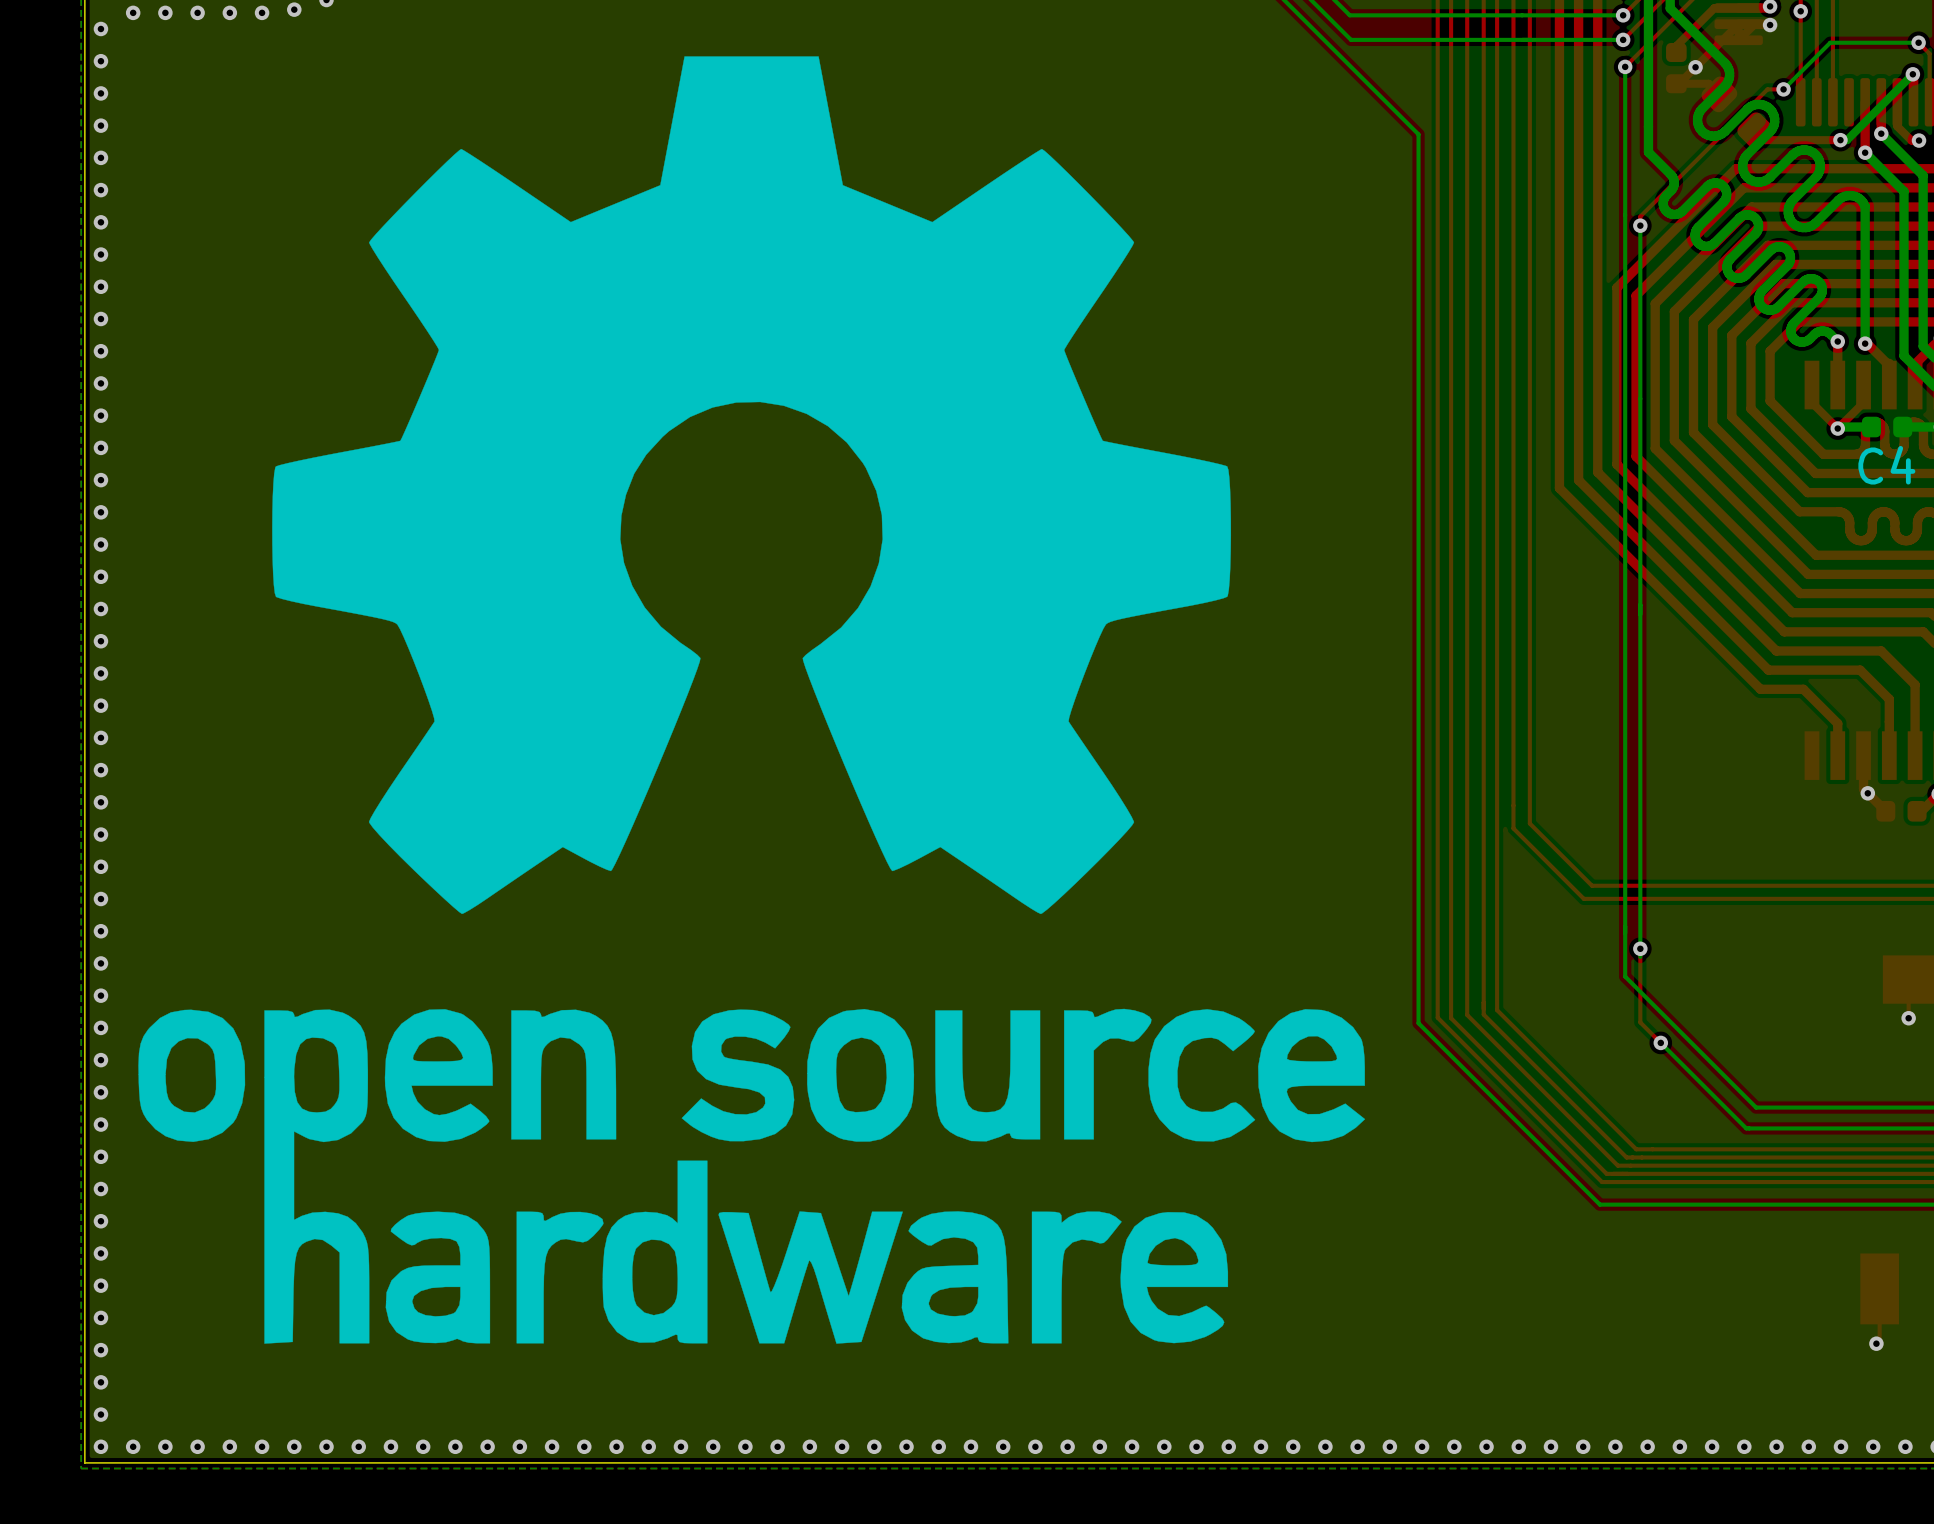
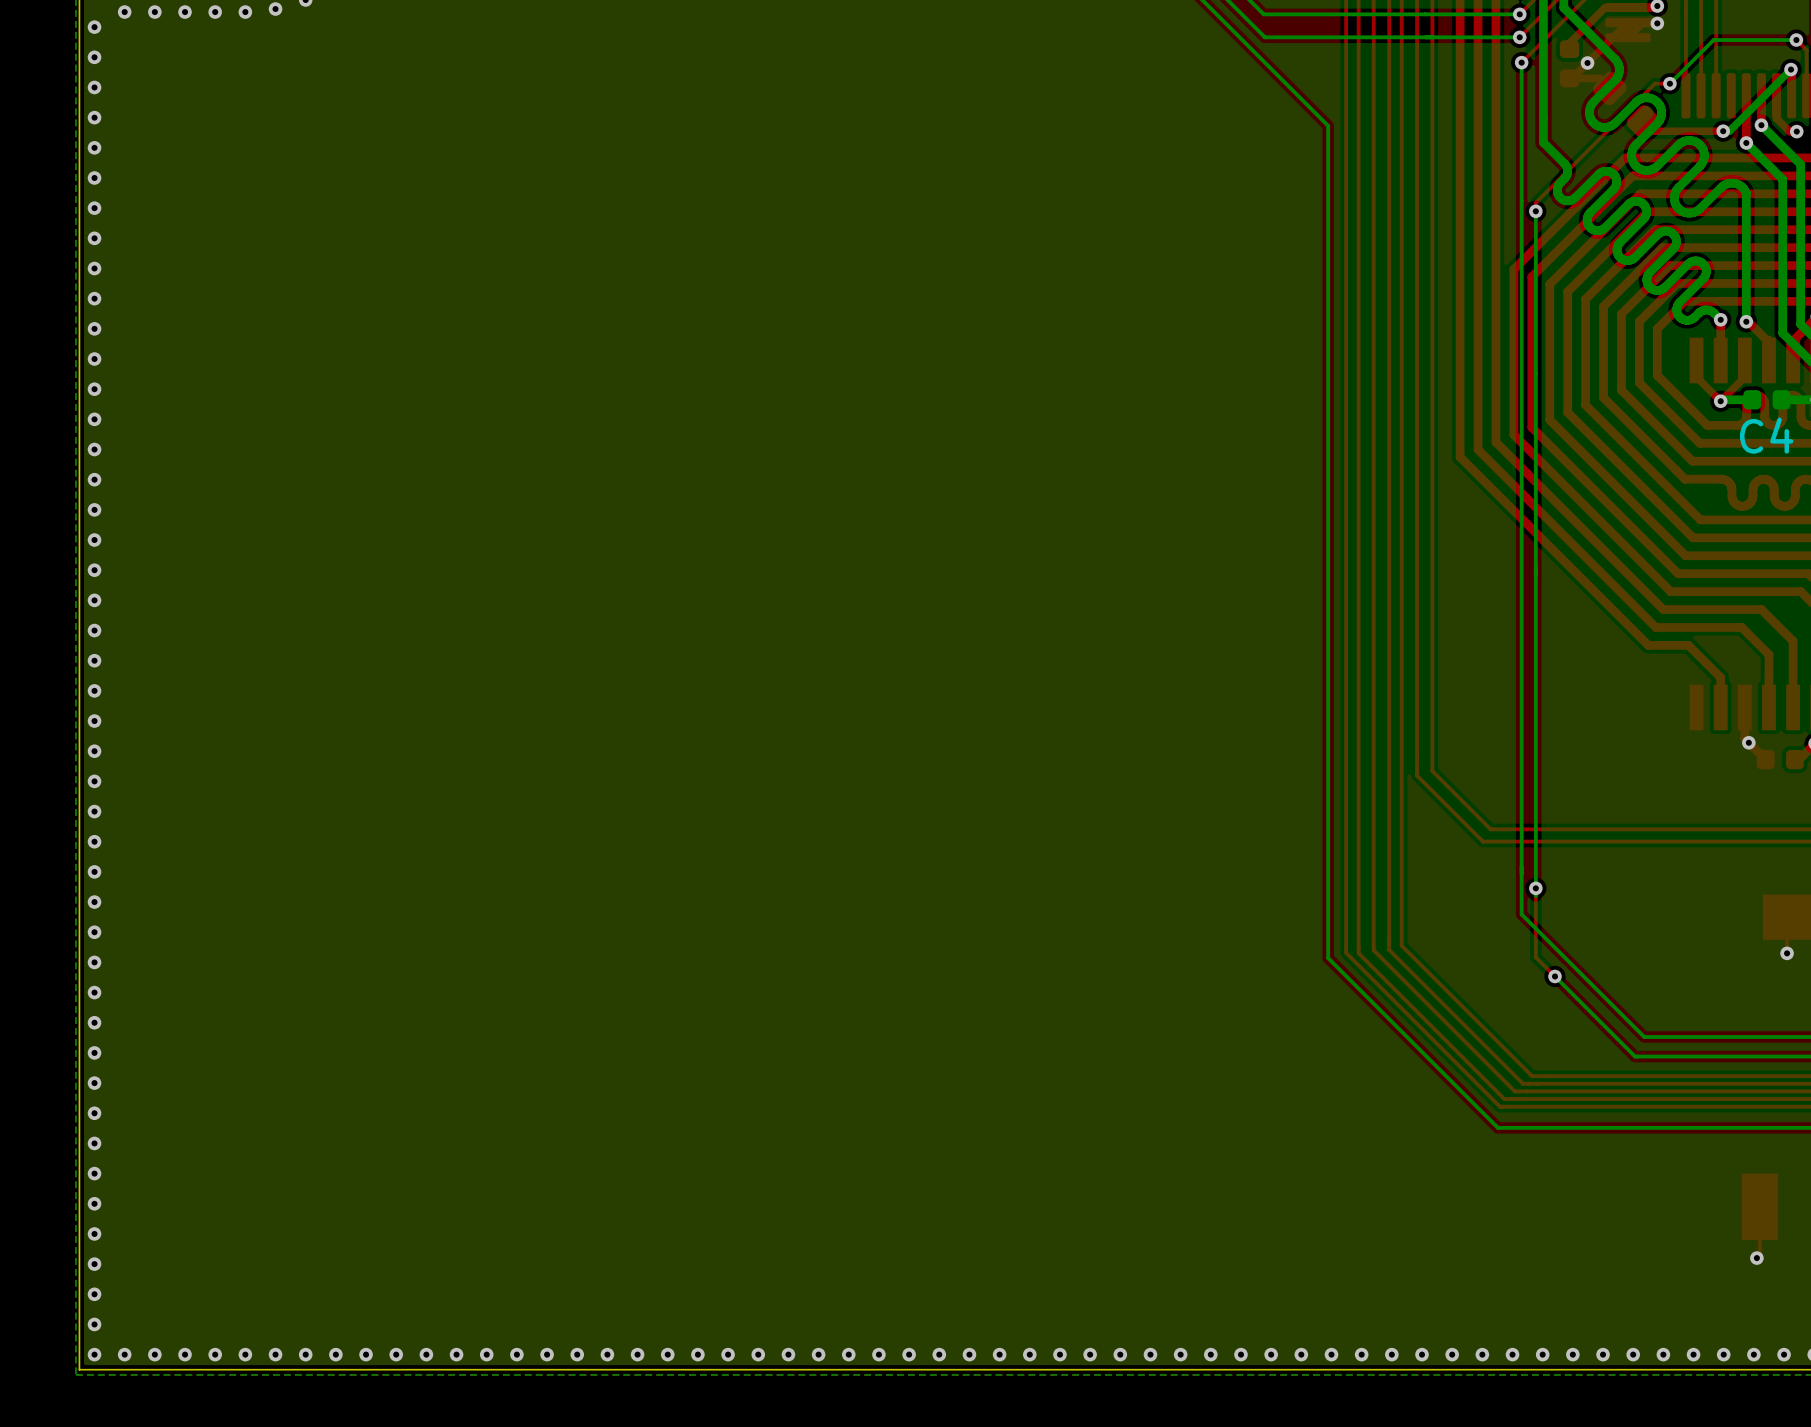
via: (1800, 11) -> none
drawing: [138, 56, 1366, 1344] -> none

